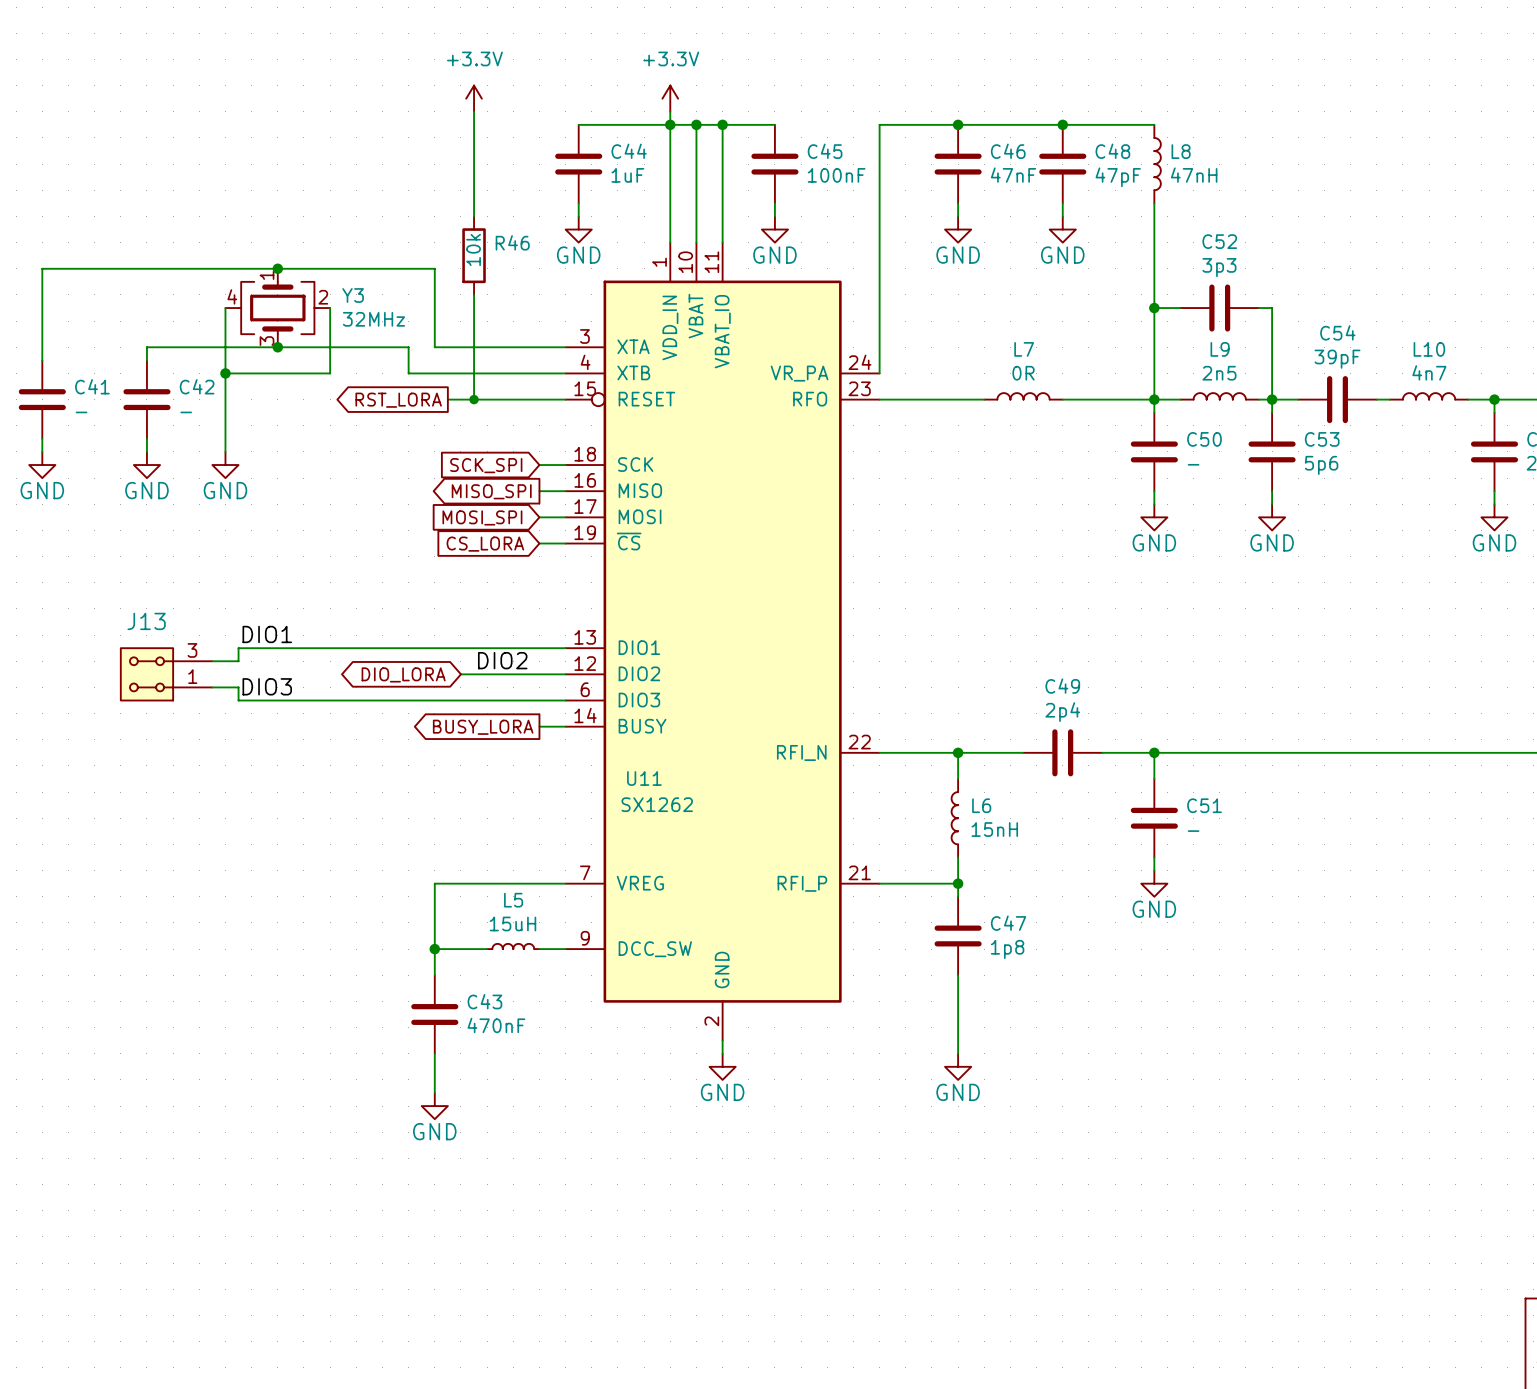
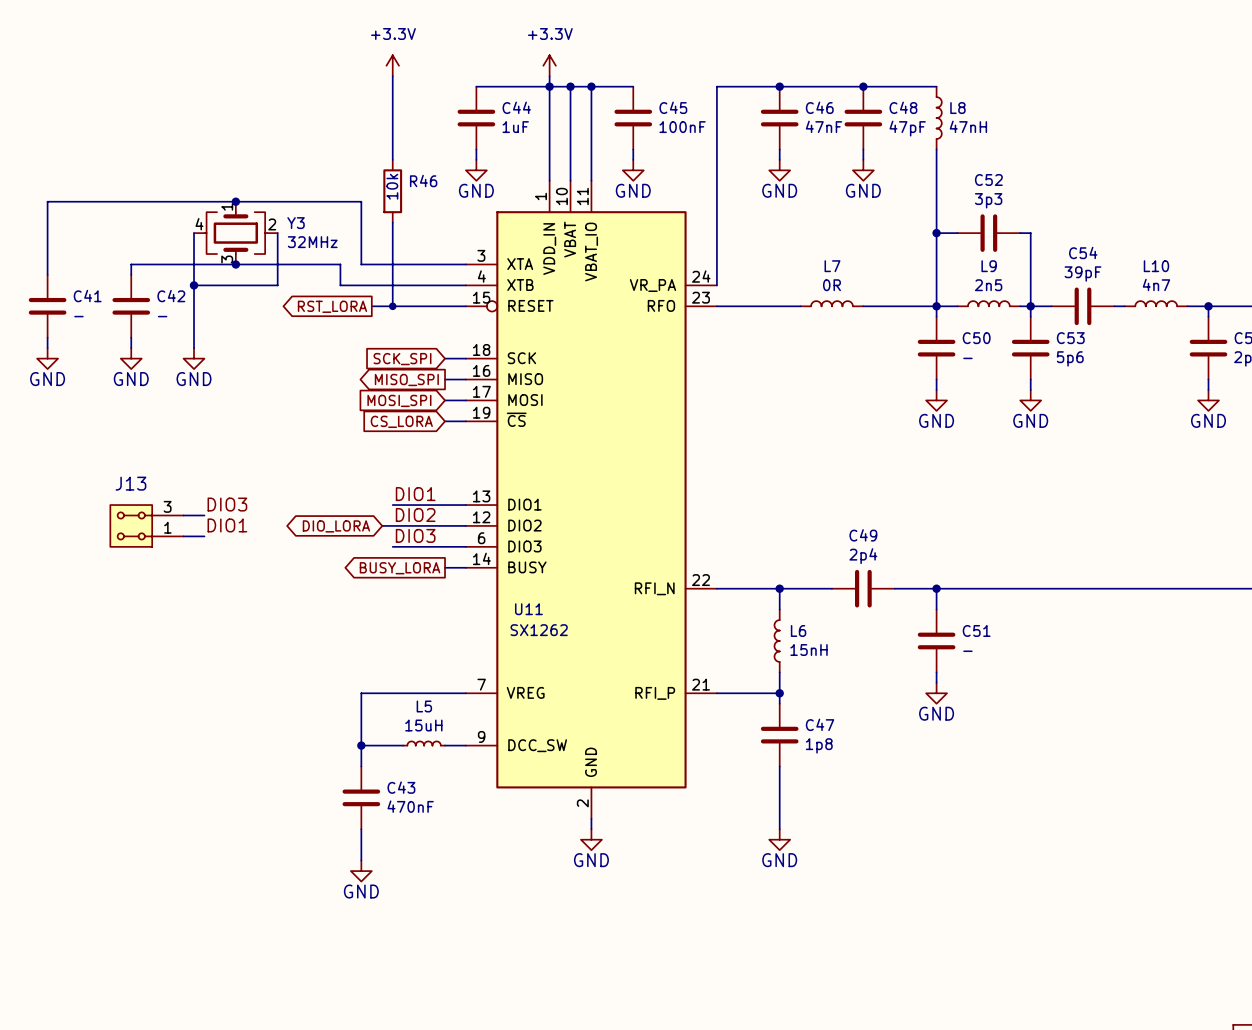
label position: DIO1 (267, 634) -> DIO1 (227, 525)
label: none -> DIO1 (415, 494)
wire: (474, 648) (238, 648) (238, 661) -> none
label position: DIO3 (267, 686) -> DIO3 (227, 504)
label: none -> DIO3 (415, 535)
wire: (238, 687) (238, 700) (474, 700) -> none

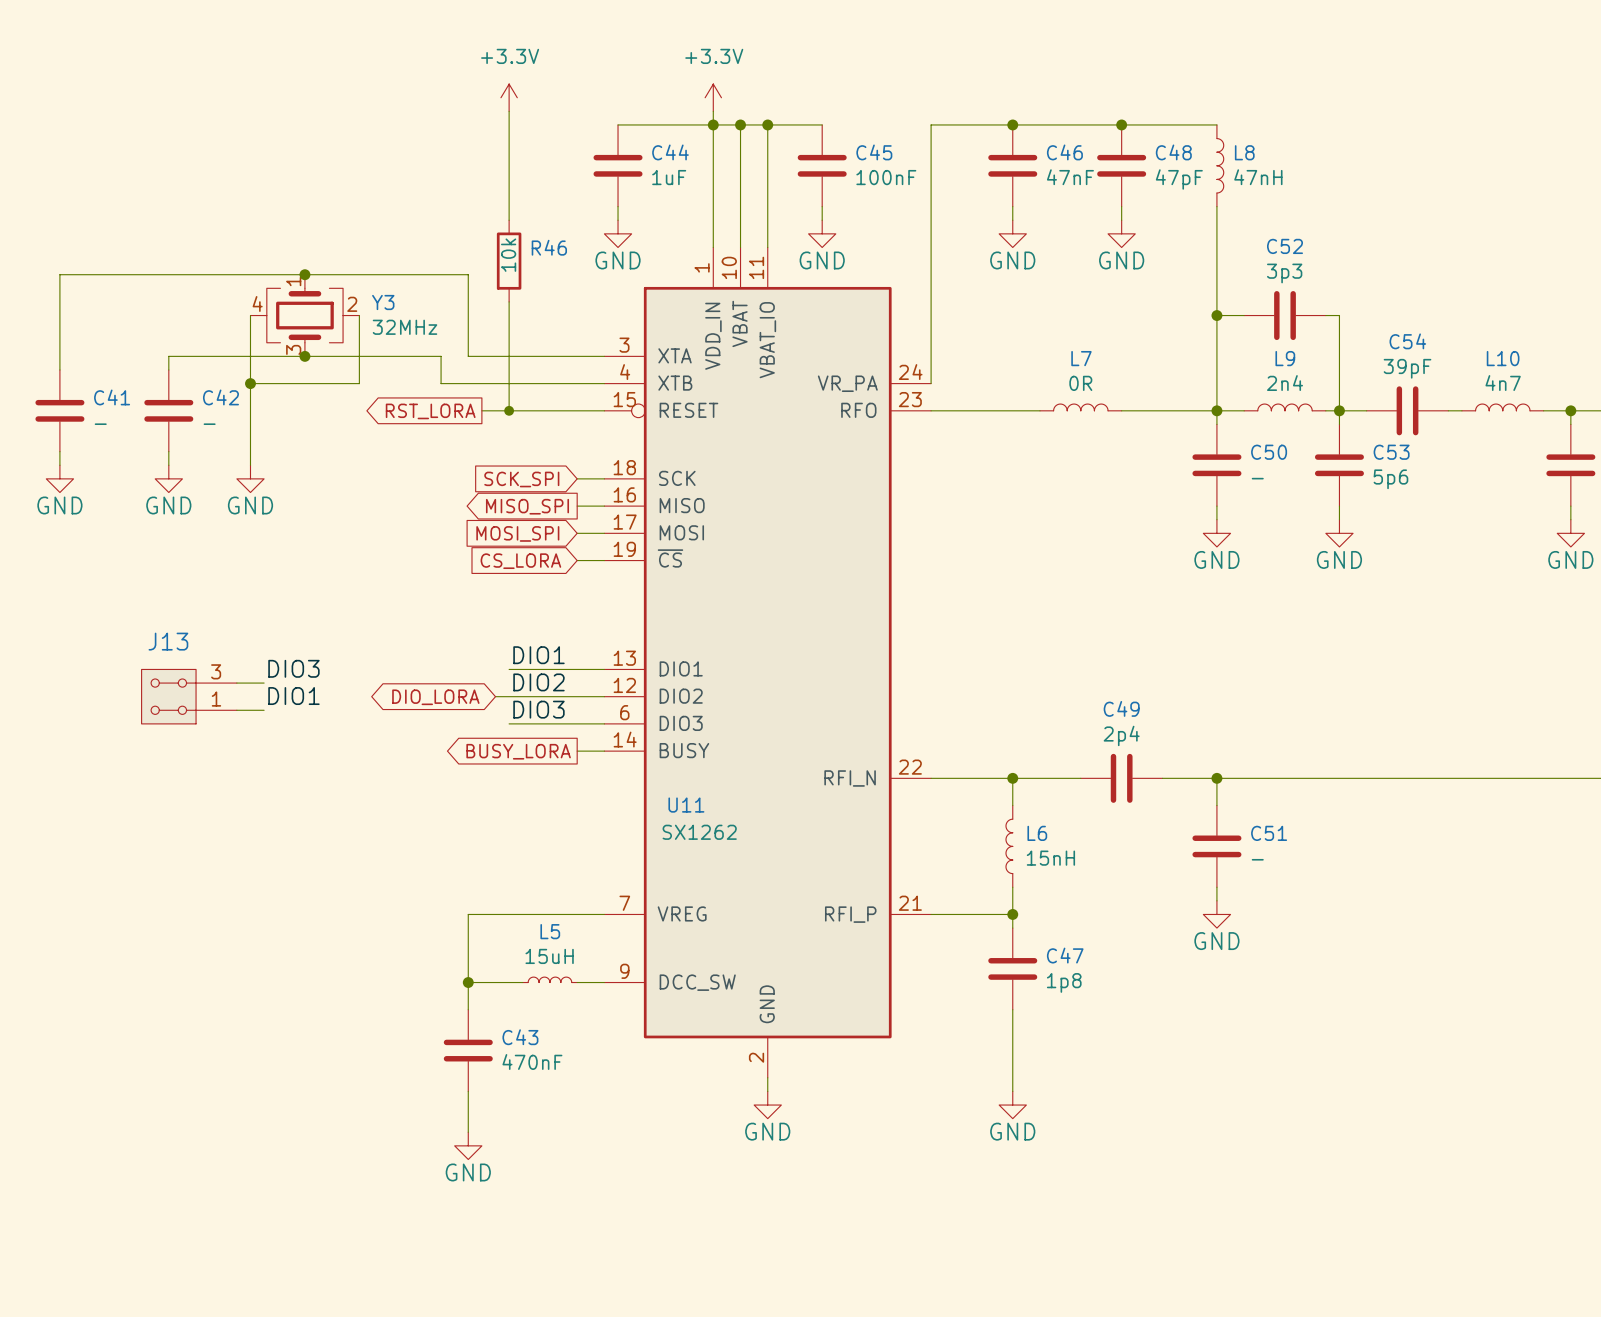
L9 value: 2n5 (988, 285) -> 2n4 (1285, 383)

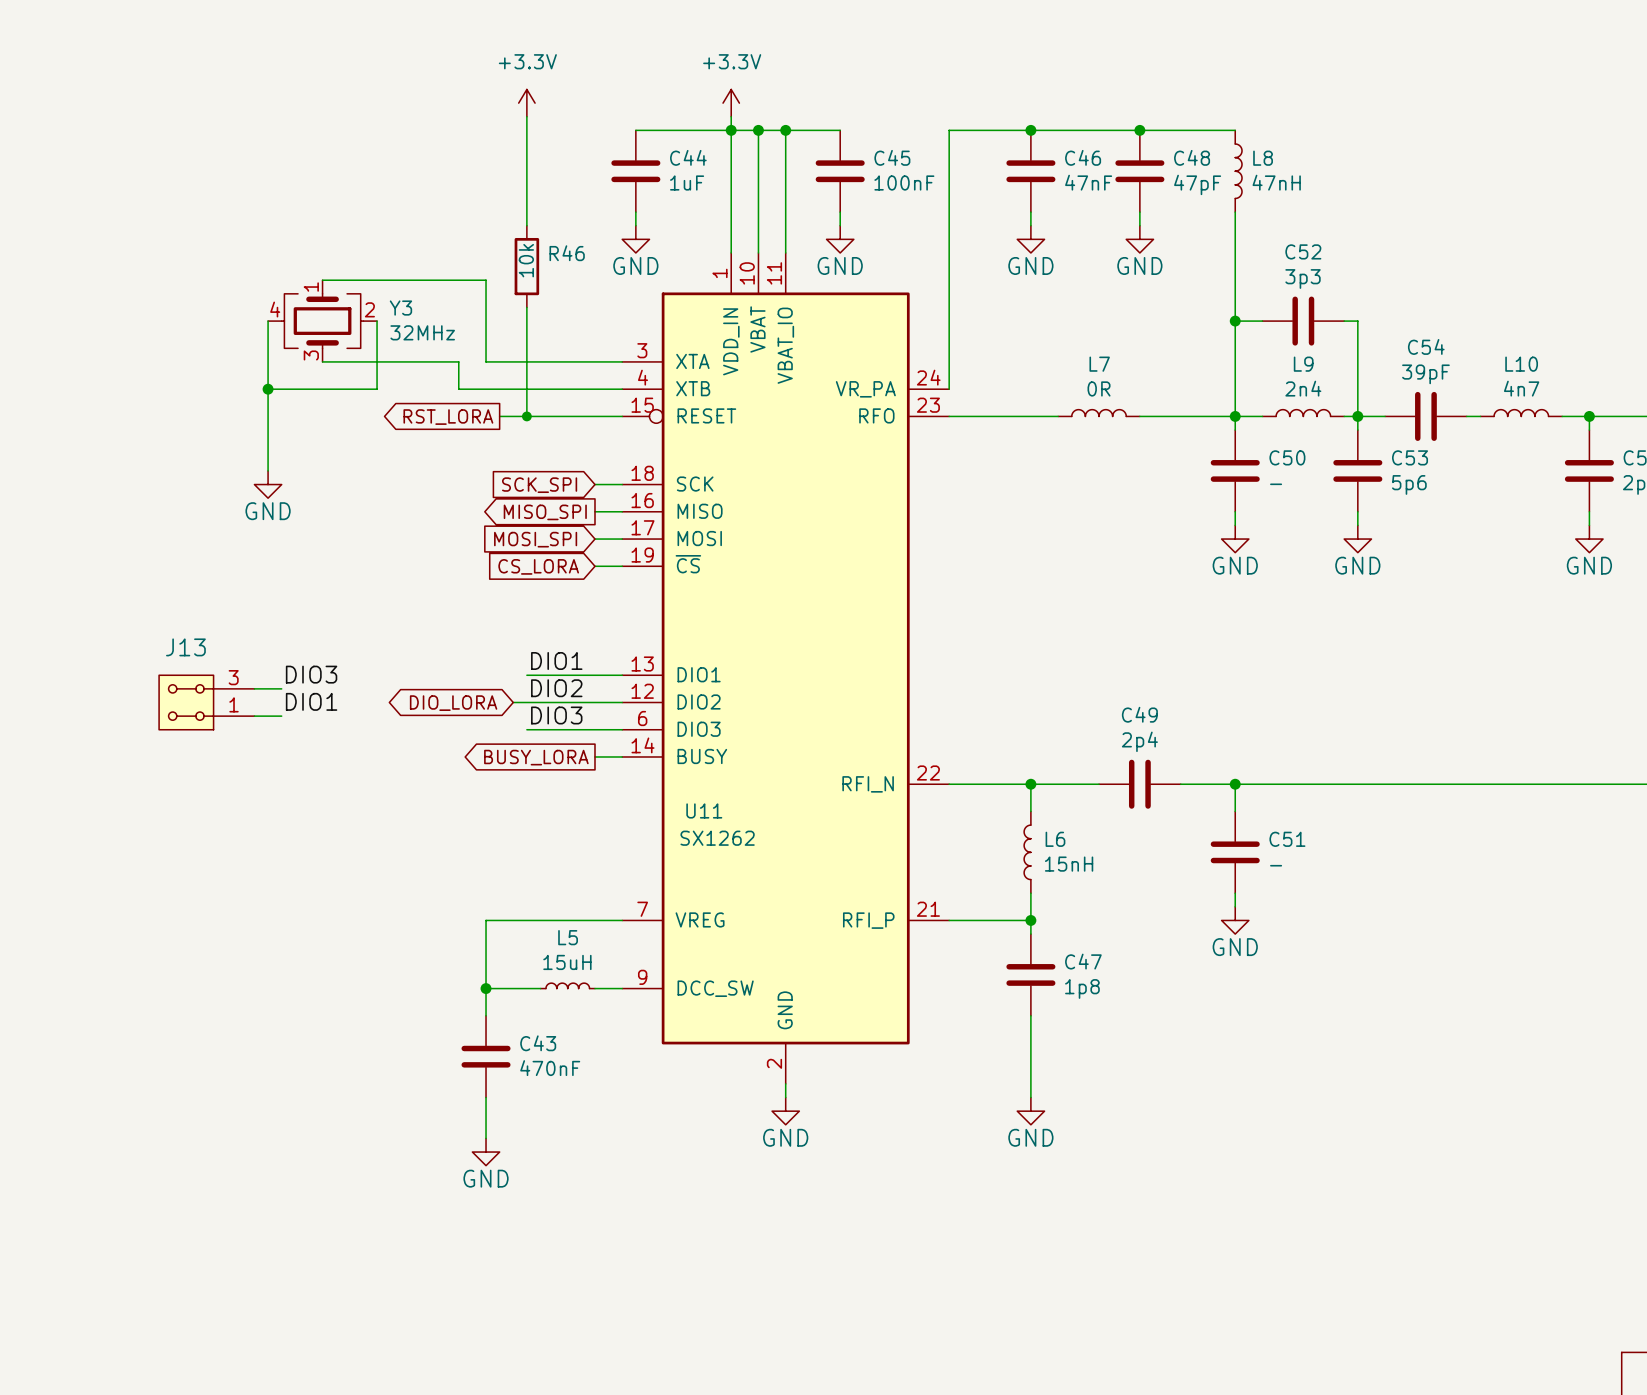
wire: (304, 274) (59, 274) (59, 369) -> none
junction: (304, 274) -> none
wire: (304, 356) (168, 356) (168, 369) -> none
junction: (304, 356) -> none
C41: - (59, 410) -> none
C42: - (168, 410) -> none
wire: (59, 451) (59, 465) -> none
wire: (168, 451) (168, 465) -> none
power symbol: GND (59, 478) -> none
power symbol: GND (168, 478) -> none

